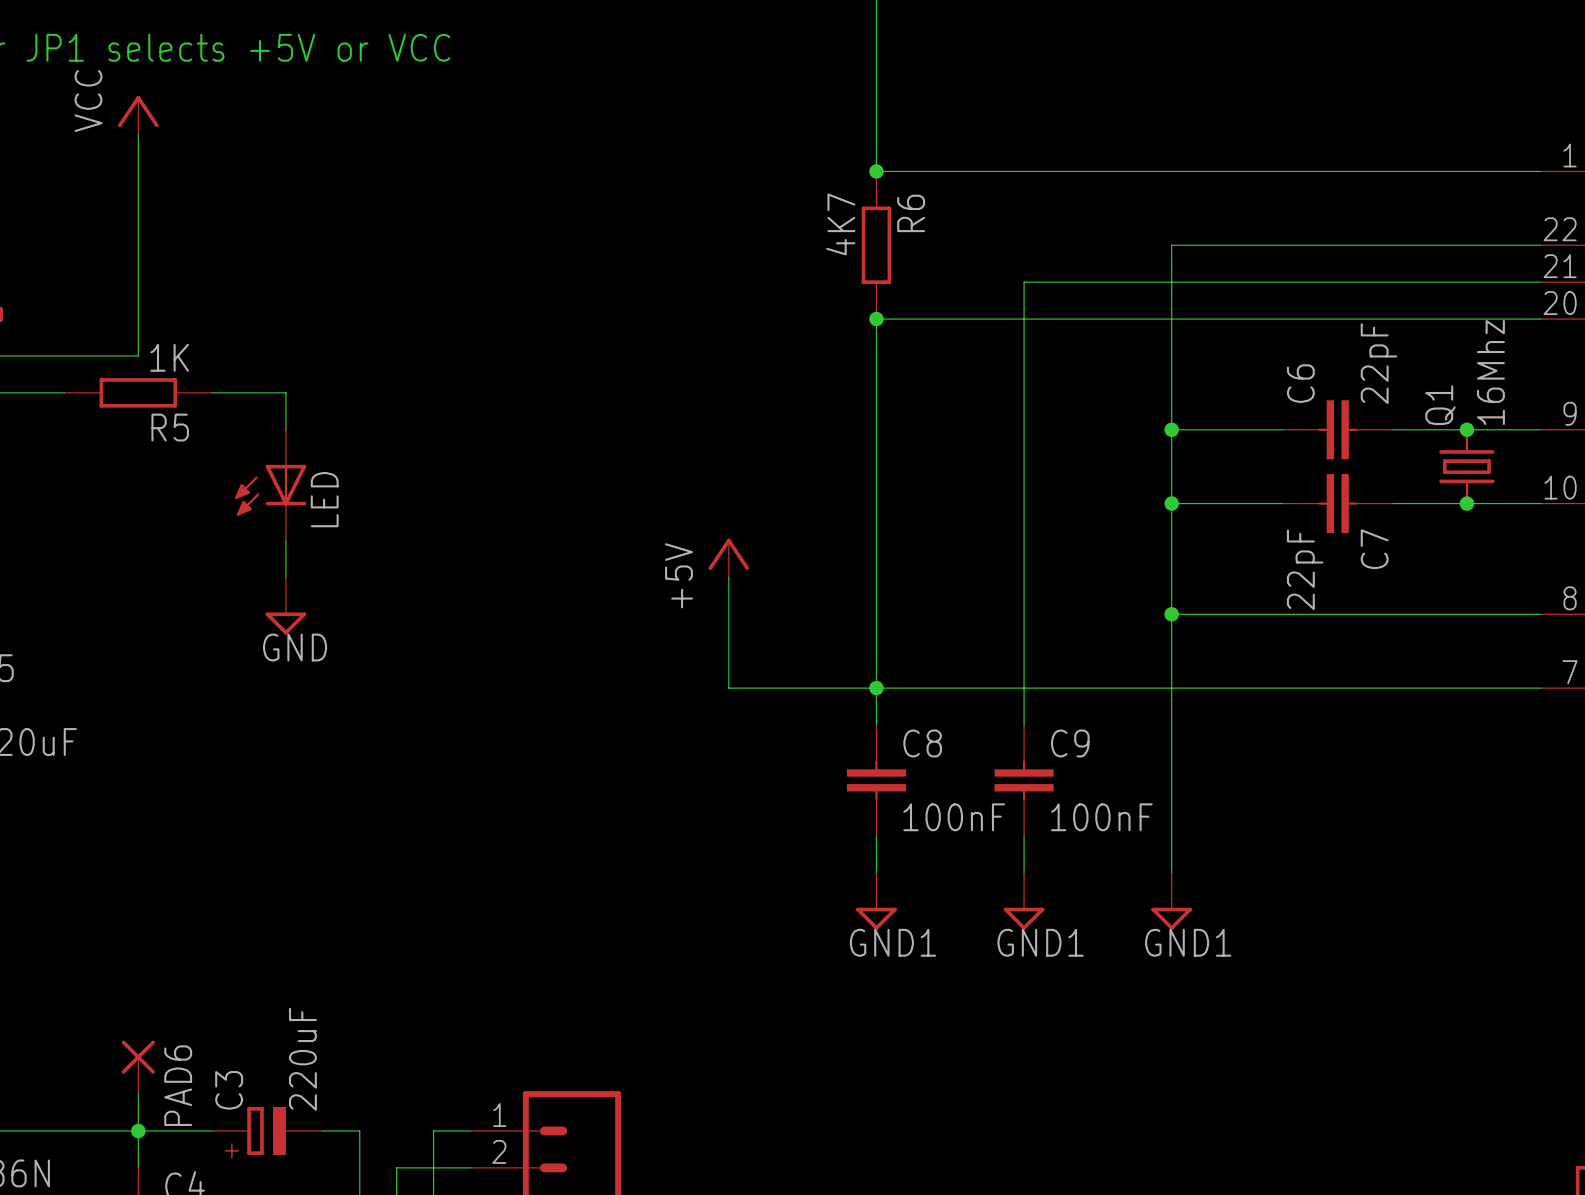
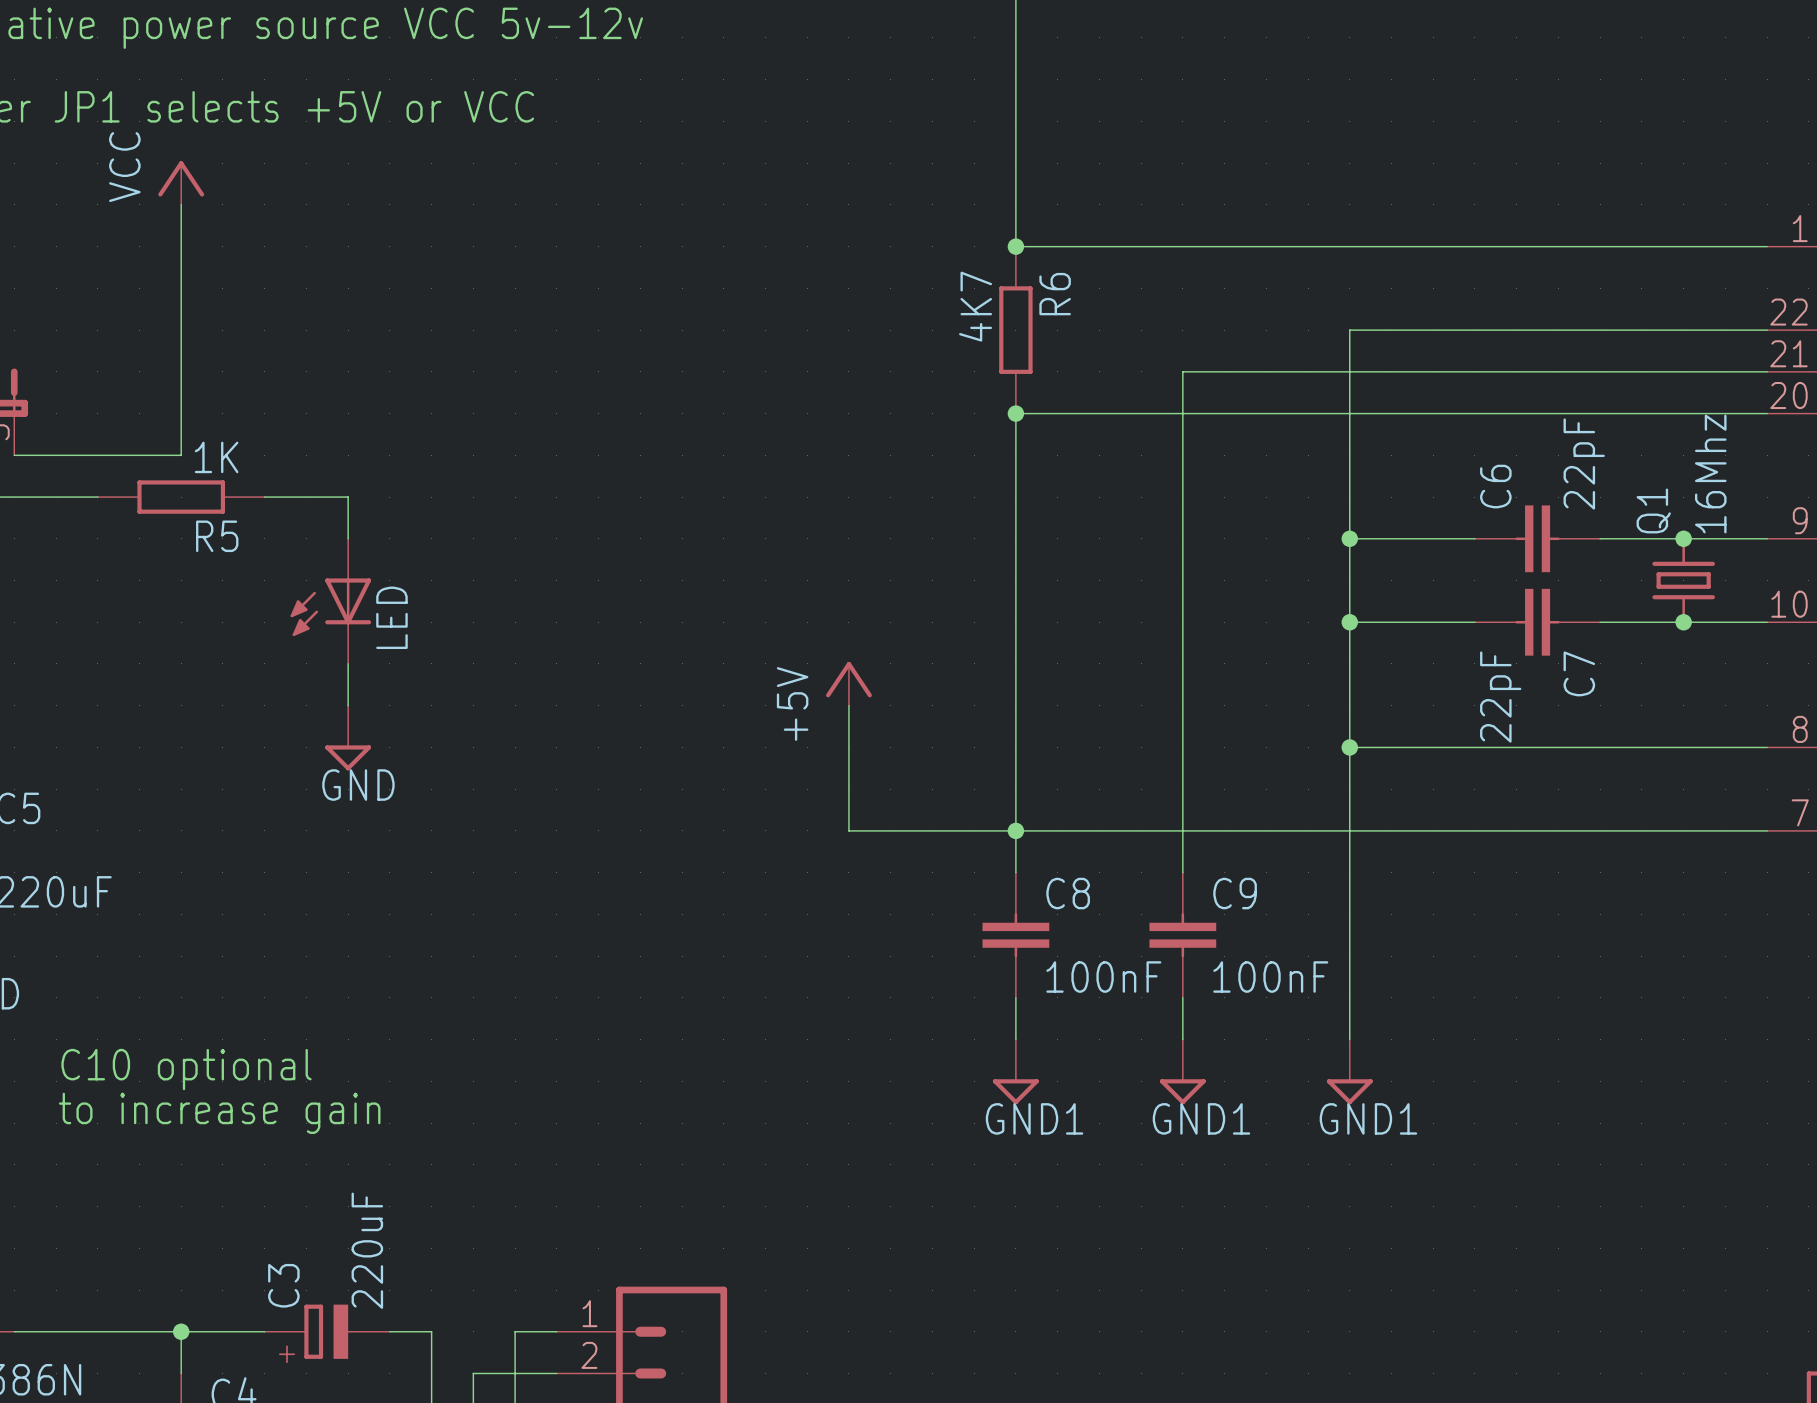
text: none -> C10 optional (186, 1069)
text: none -> to increase gain (219, 1113)
PAD6: (138, 1067) -> none
wire: (138, 1094) (138, 1130) -> none

